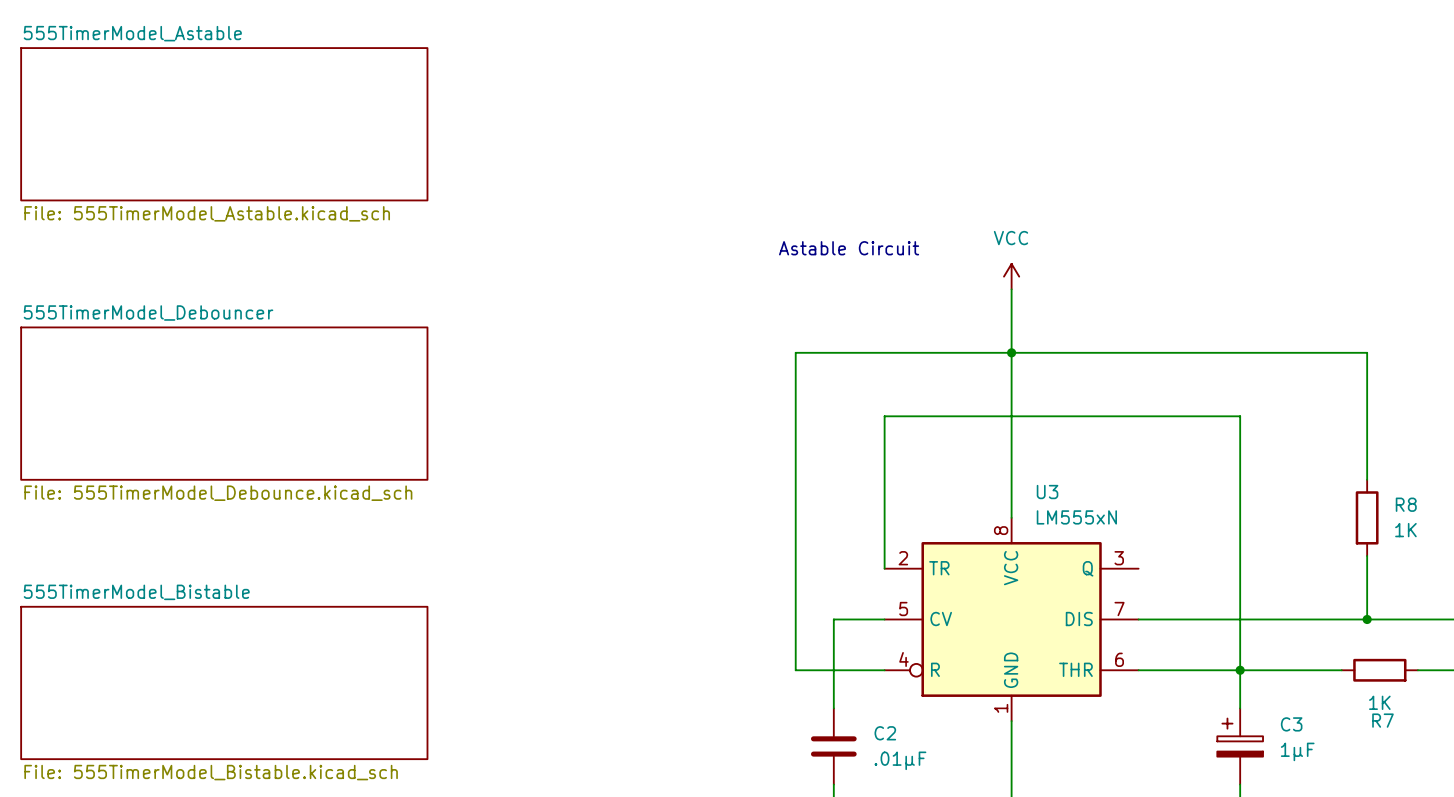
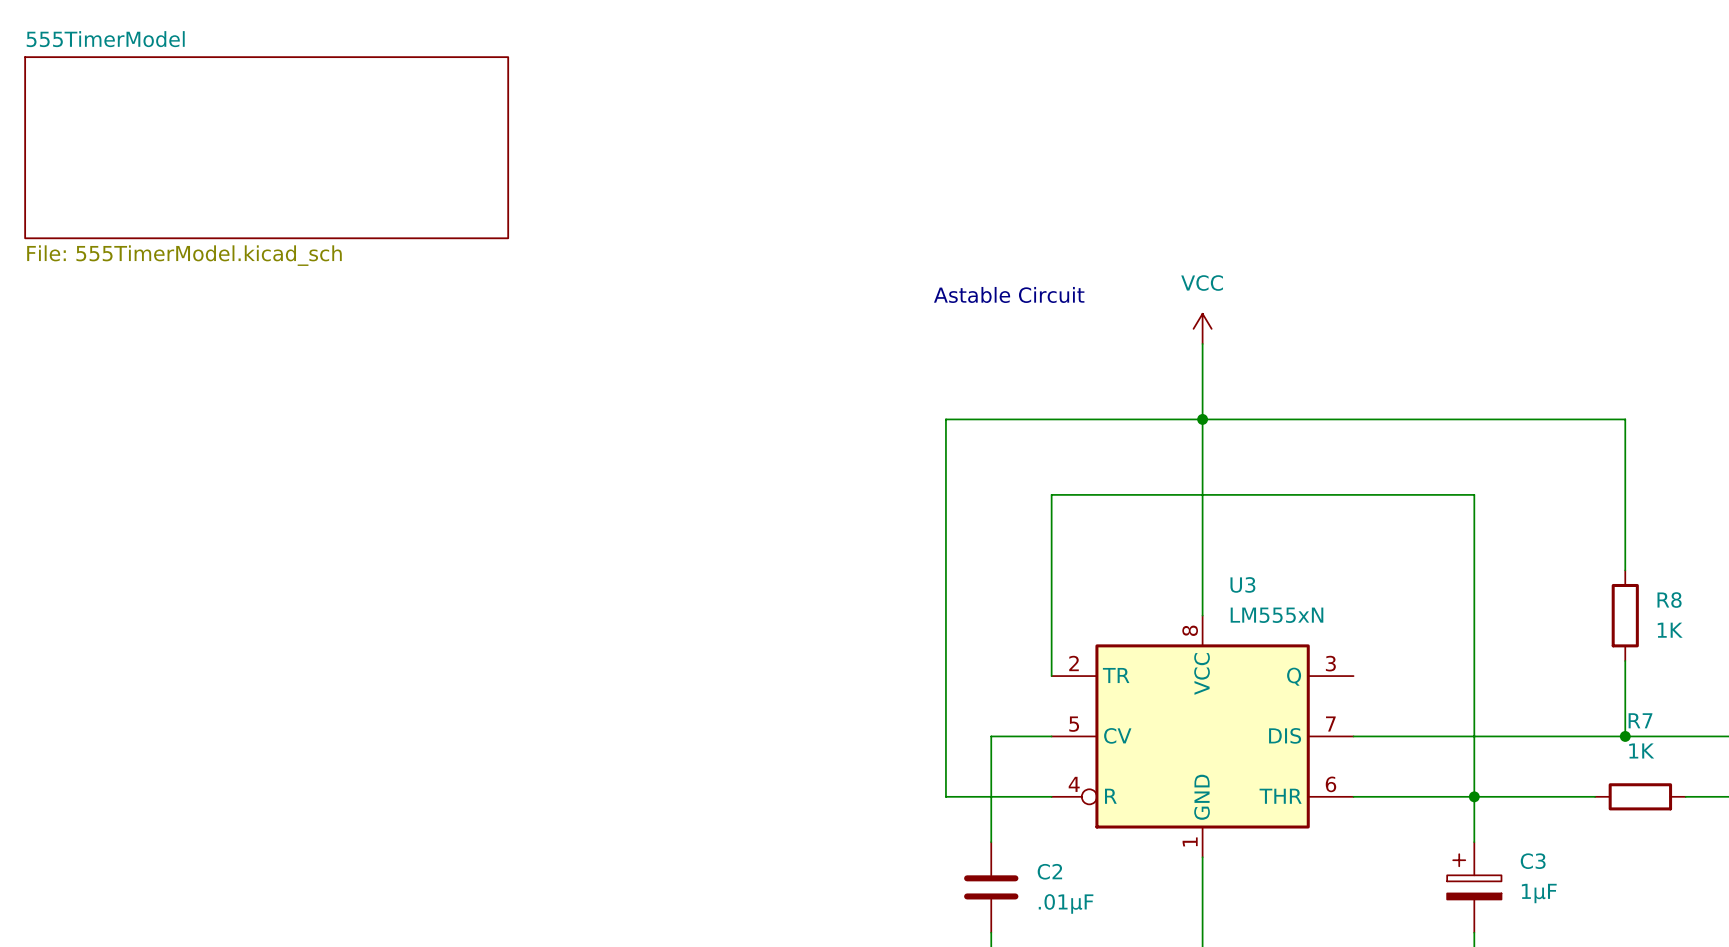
sheet 555TimerModel_Astable name: 555TimerModel_Astable (132, 33) -> 555TimerModel (105, 39)
sheet 555TimerModel_Astable value: File: 555TimerModel_Astable.kicad_sch (207, 213) -> File: 555TimerModel.kicad_sch (184, 255)
sheet 555TimerModel_Debouncer: File: 555TimerModel_Debounce.kicad_sch (224, 403) -> none
sheet 555TimerModel_Bistable: File: 555TimerModel_Bistable.kicad_sch (224, 682) -> none
R7 value position: 1K (1379, 702) -> 1K (1641, 750)
R7 name position: R7 (1382, 720) -> R7 (1640, 720)

